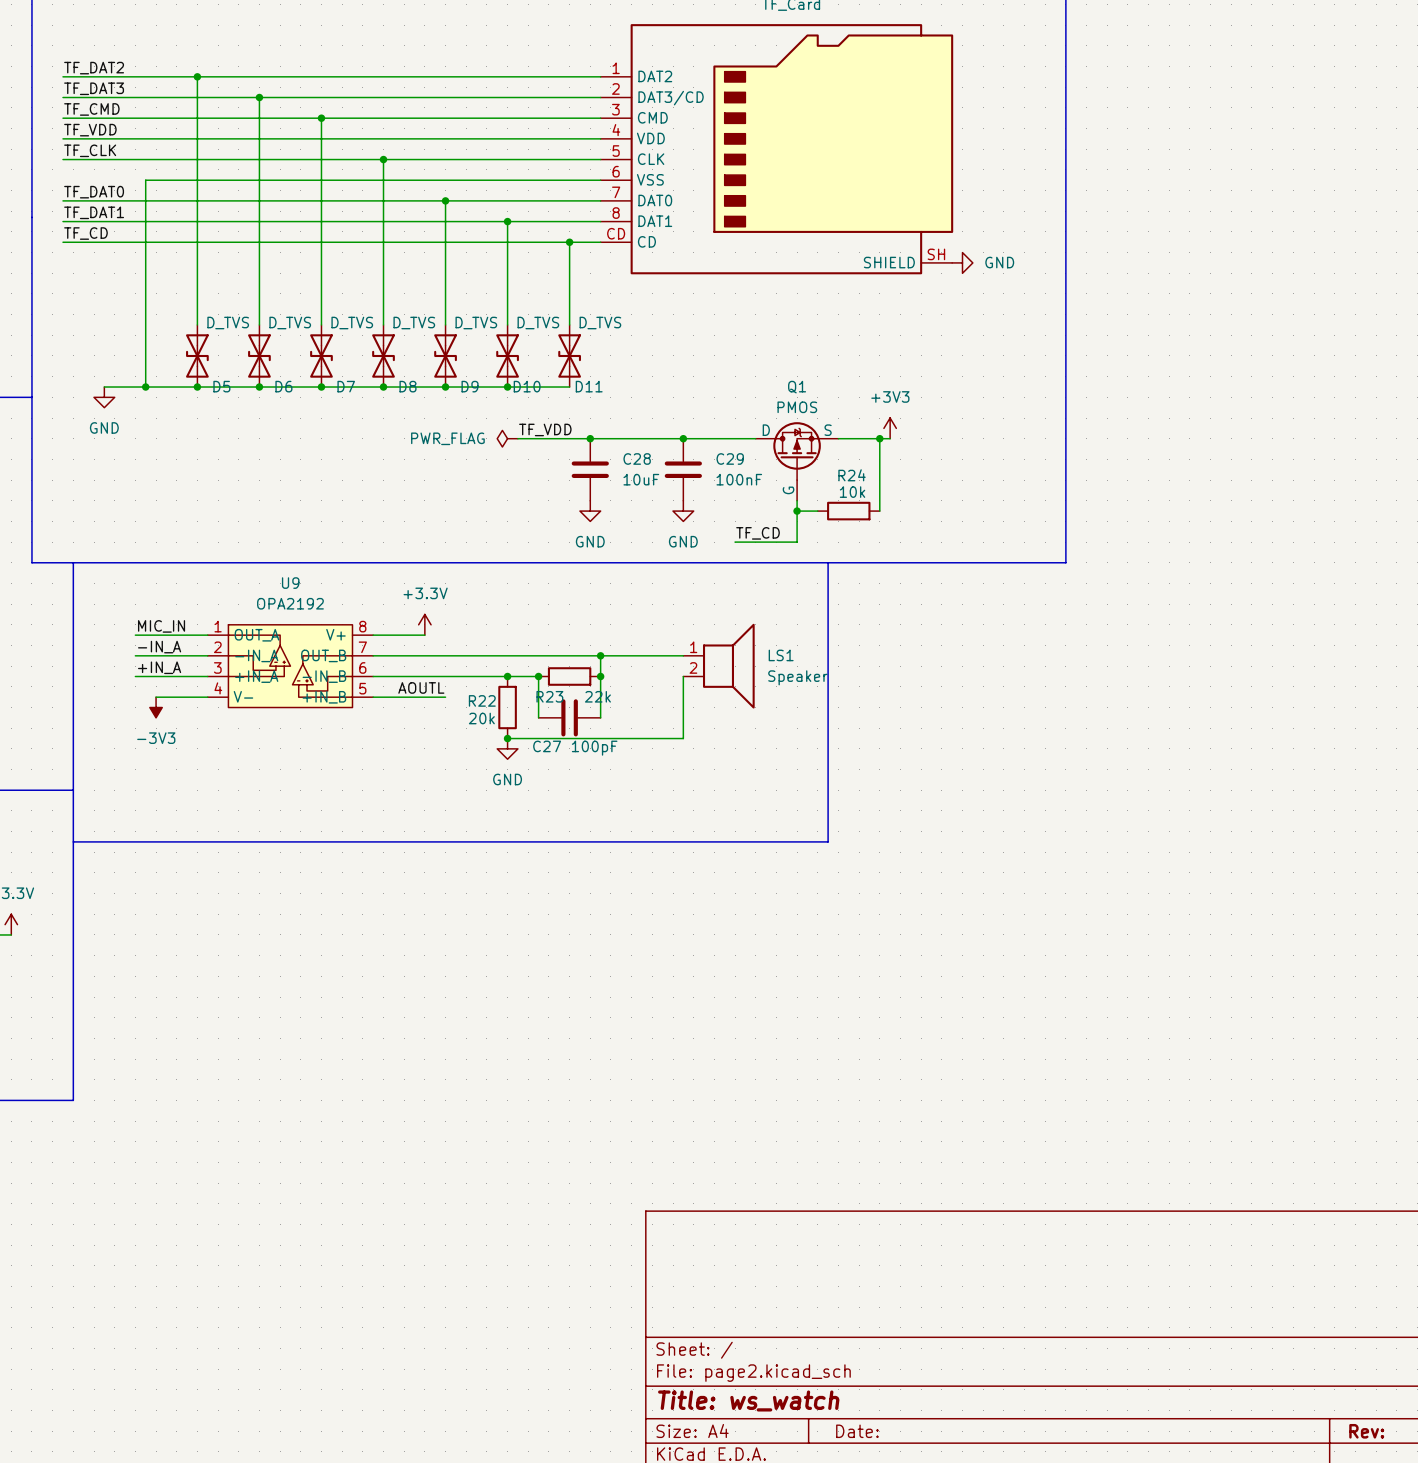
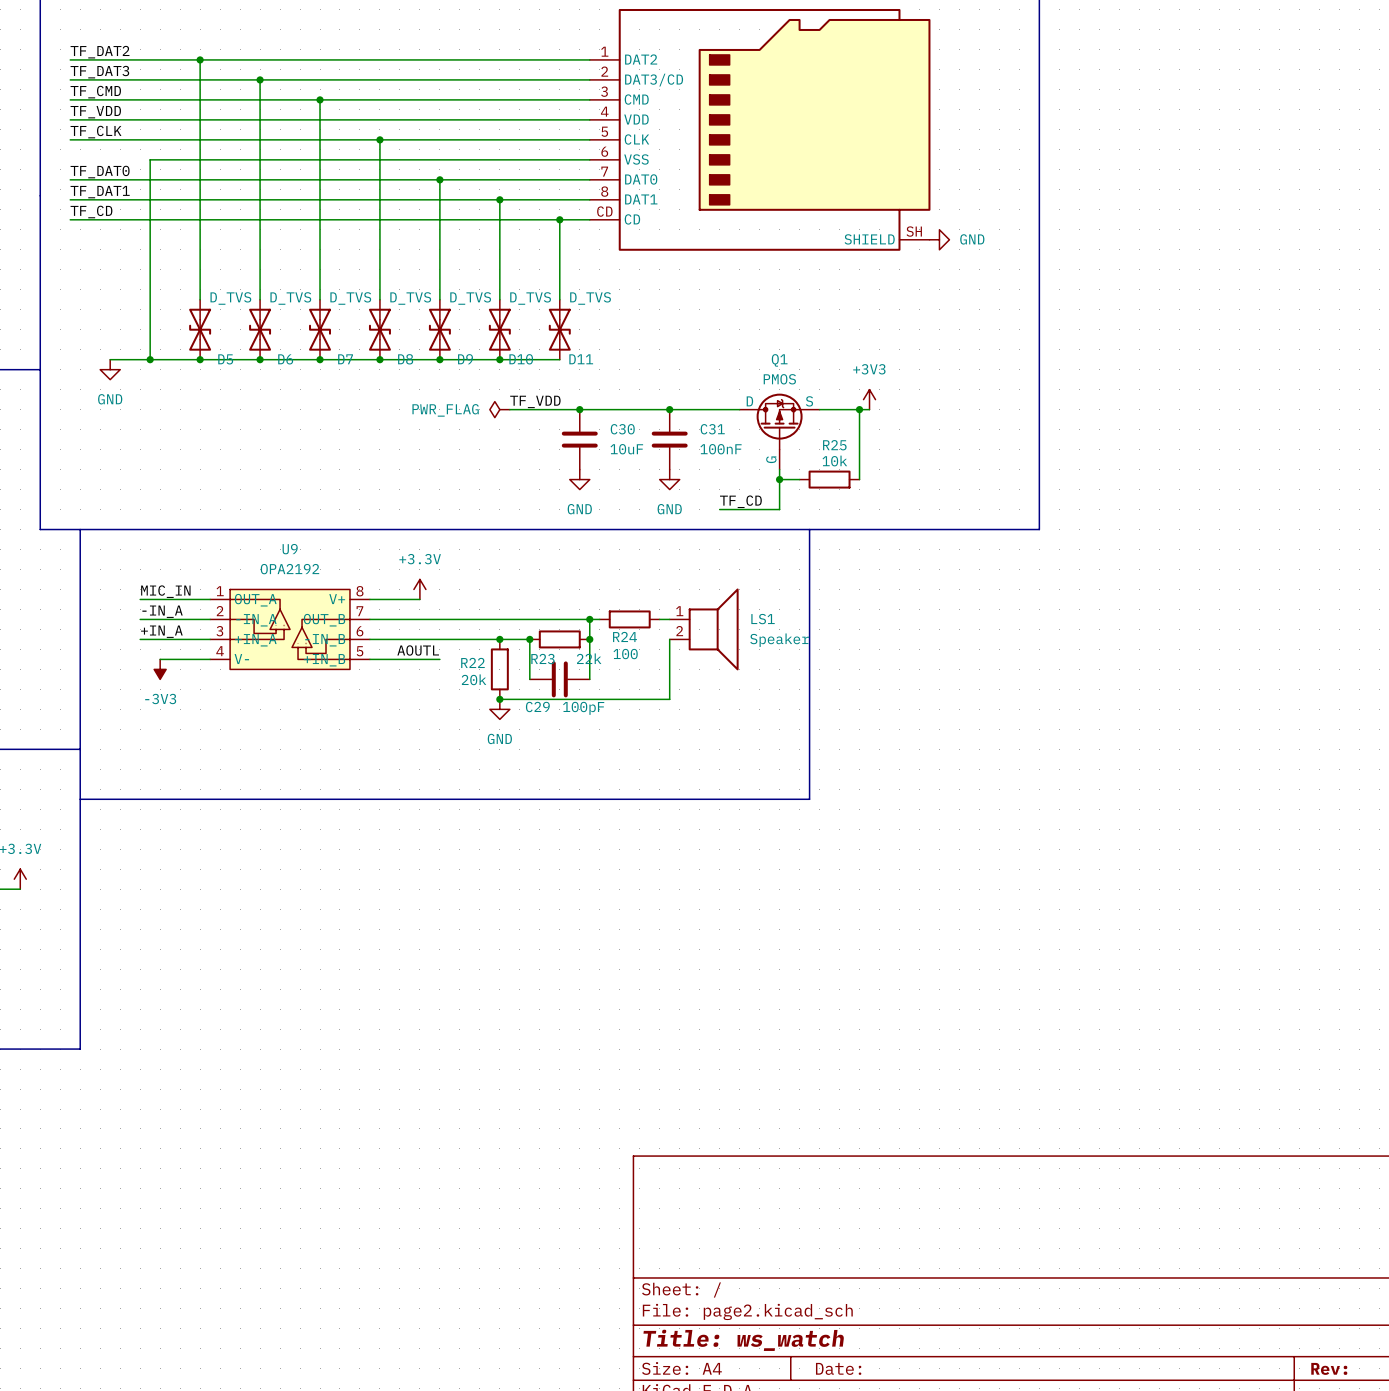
C28 name: C28 (637, 458) -> C30 (622, 429)
C29 name: C29 (730, 458) -> C31 (712, 429)
R24 name: R24 (852, 475) -> R25 (834, 445)
wire: (610, 655) (673, 655) -> none
R24: none -> 100 (629, 619)
C27 name: C27 (547, 746) -> C29 (537, 706)

